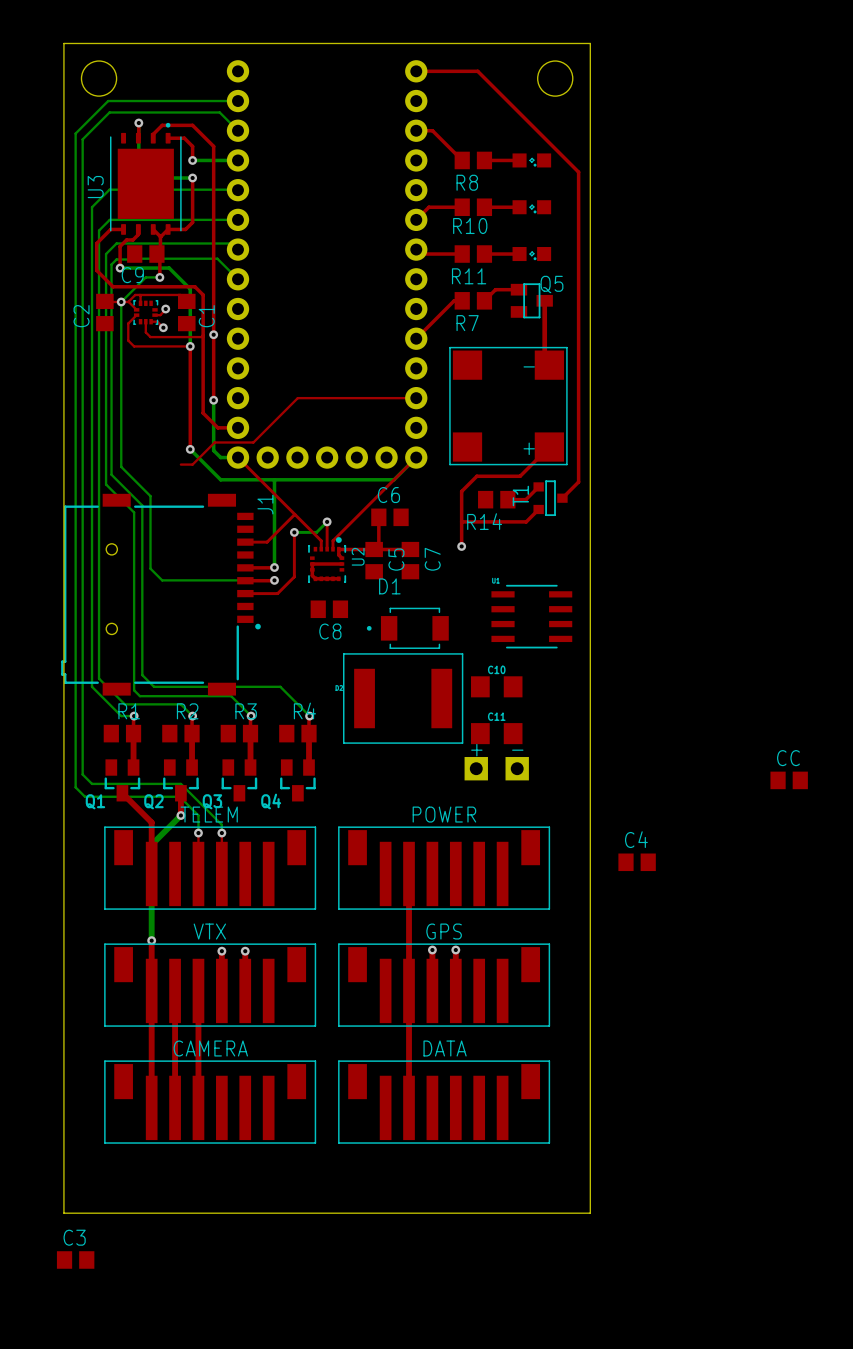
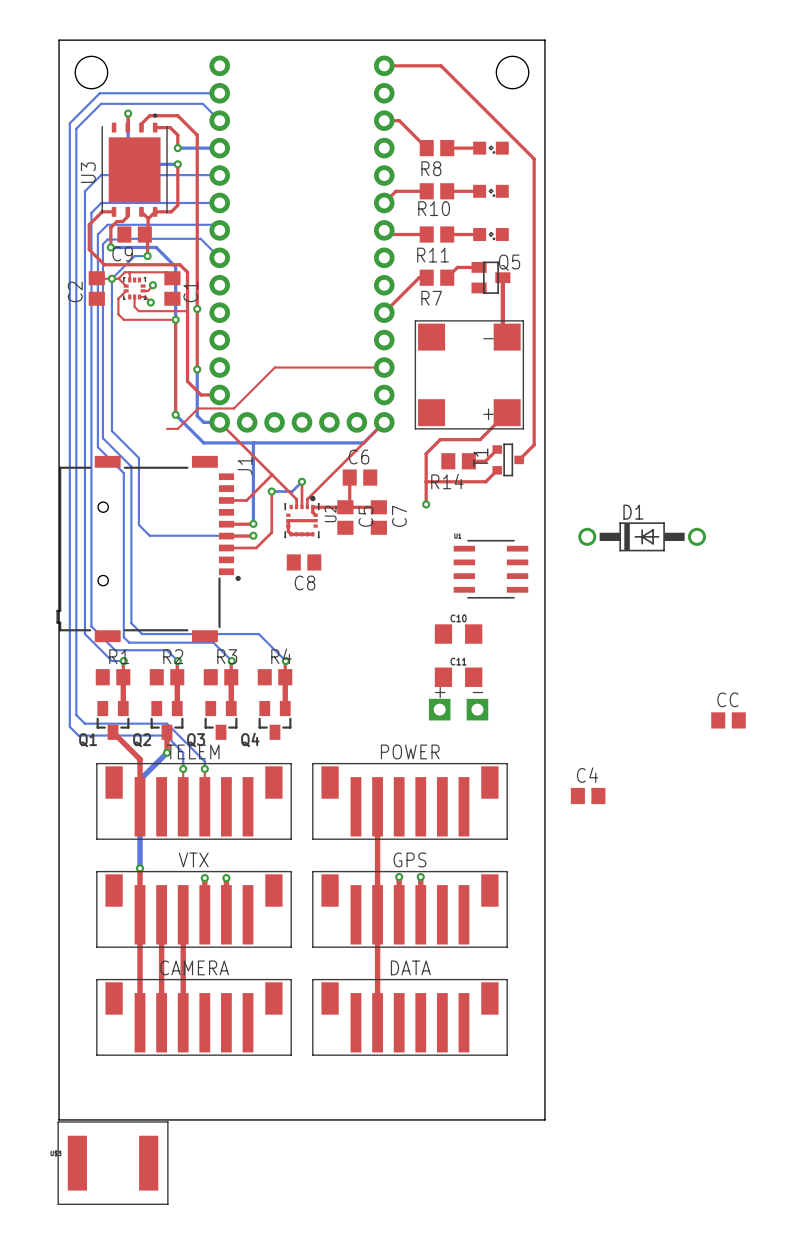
D1 footprint: [366, 607, 449, 649] -> [578, 522, 707, 552]
part: (403, 698) -> none
C3: (75, 1259) -> none
part: none -> (113, 1163)

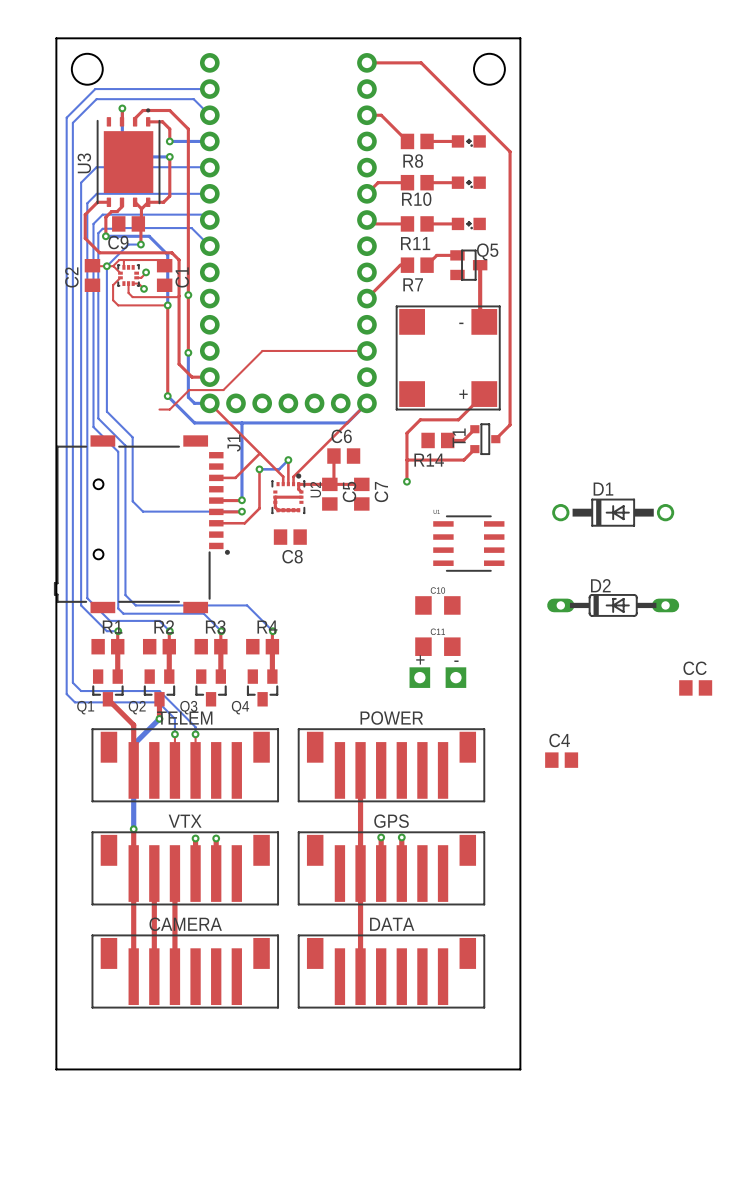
D2: none -> (613, 605)
part: (113, 1163) -> none

